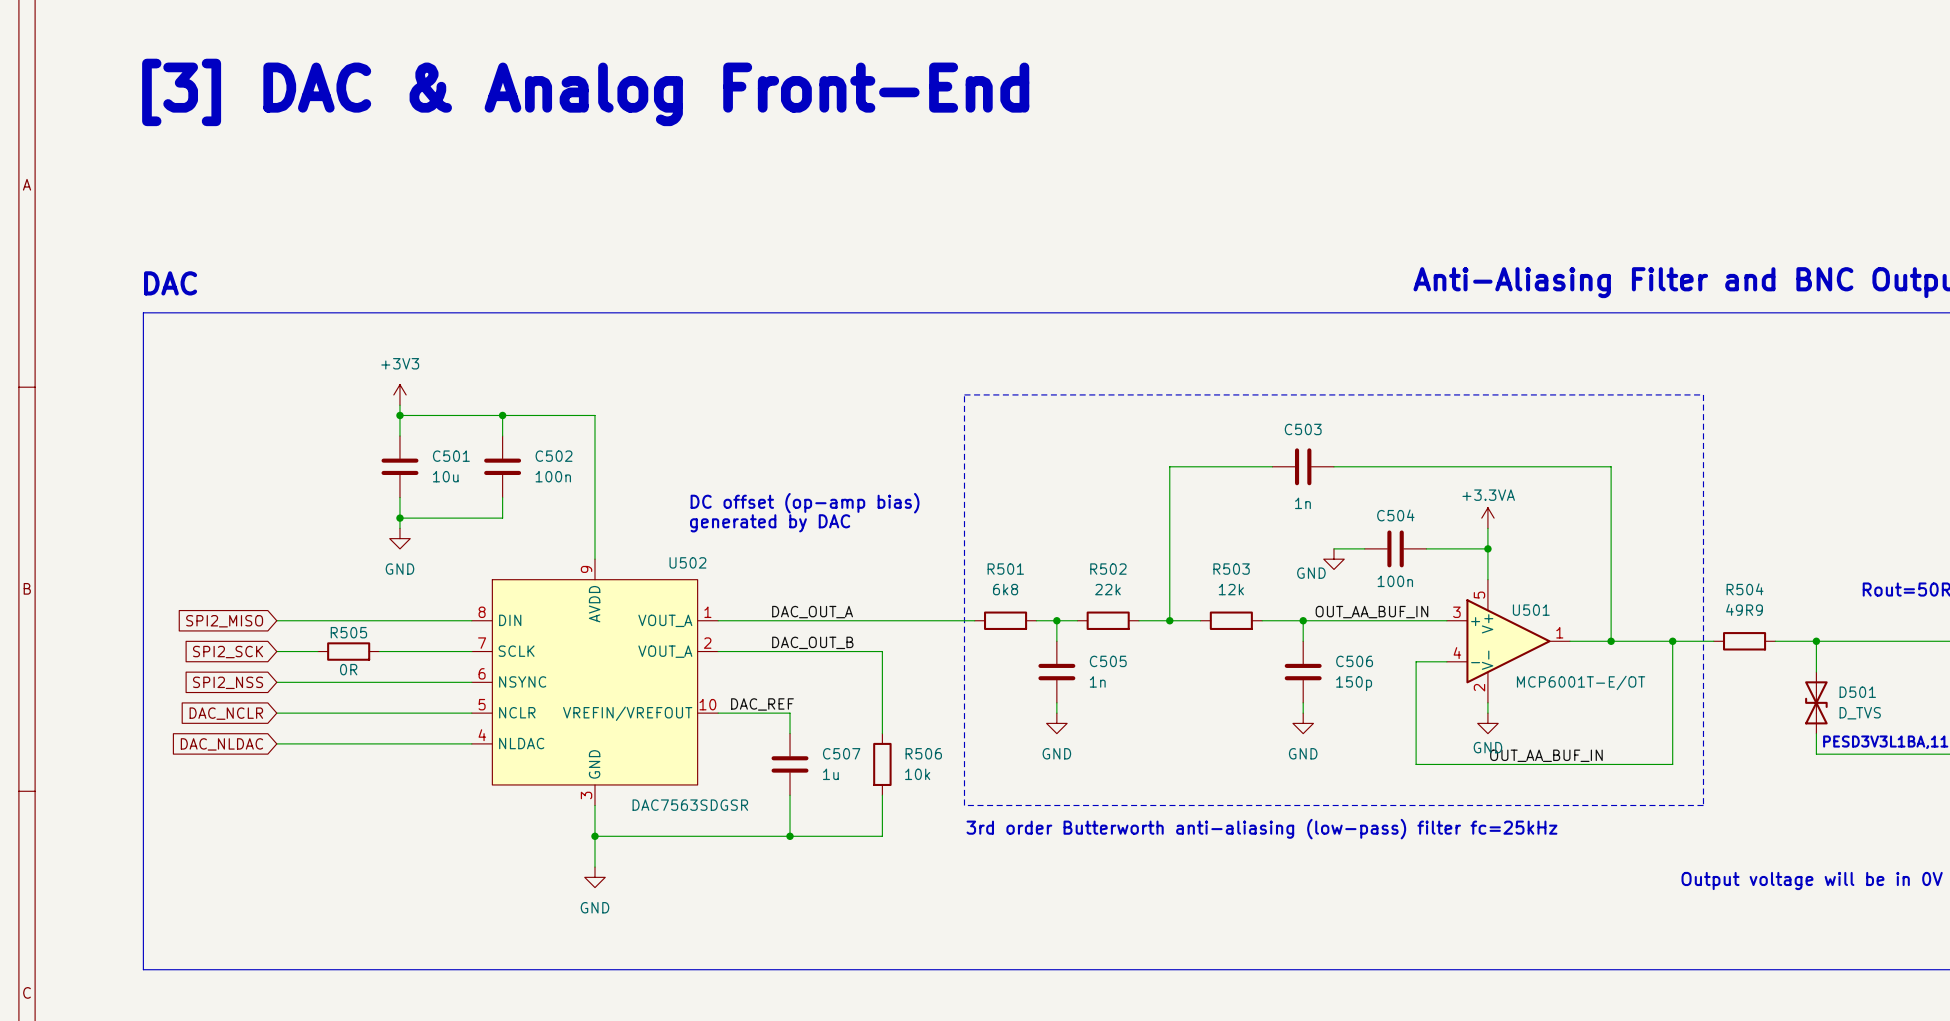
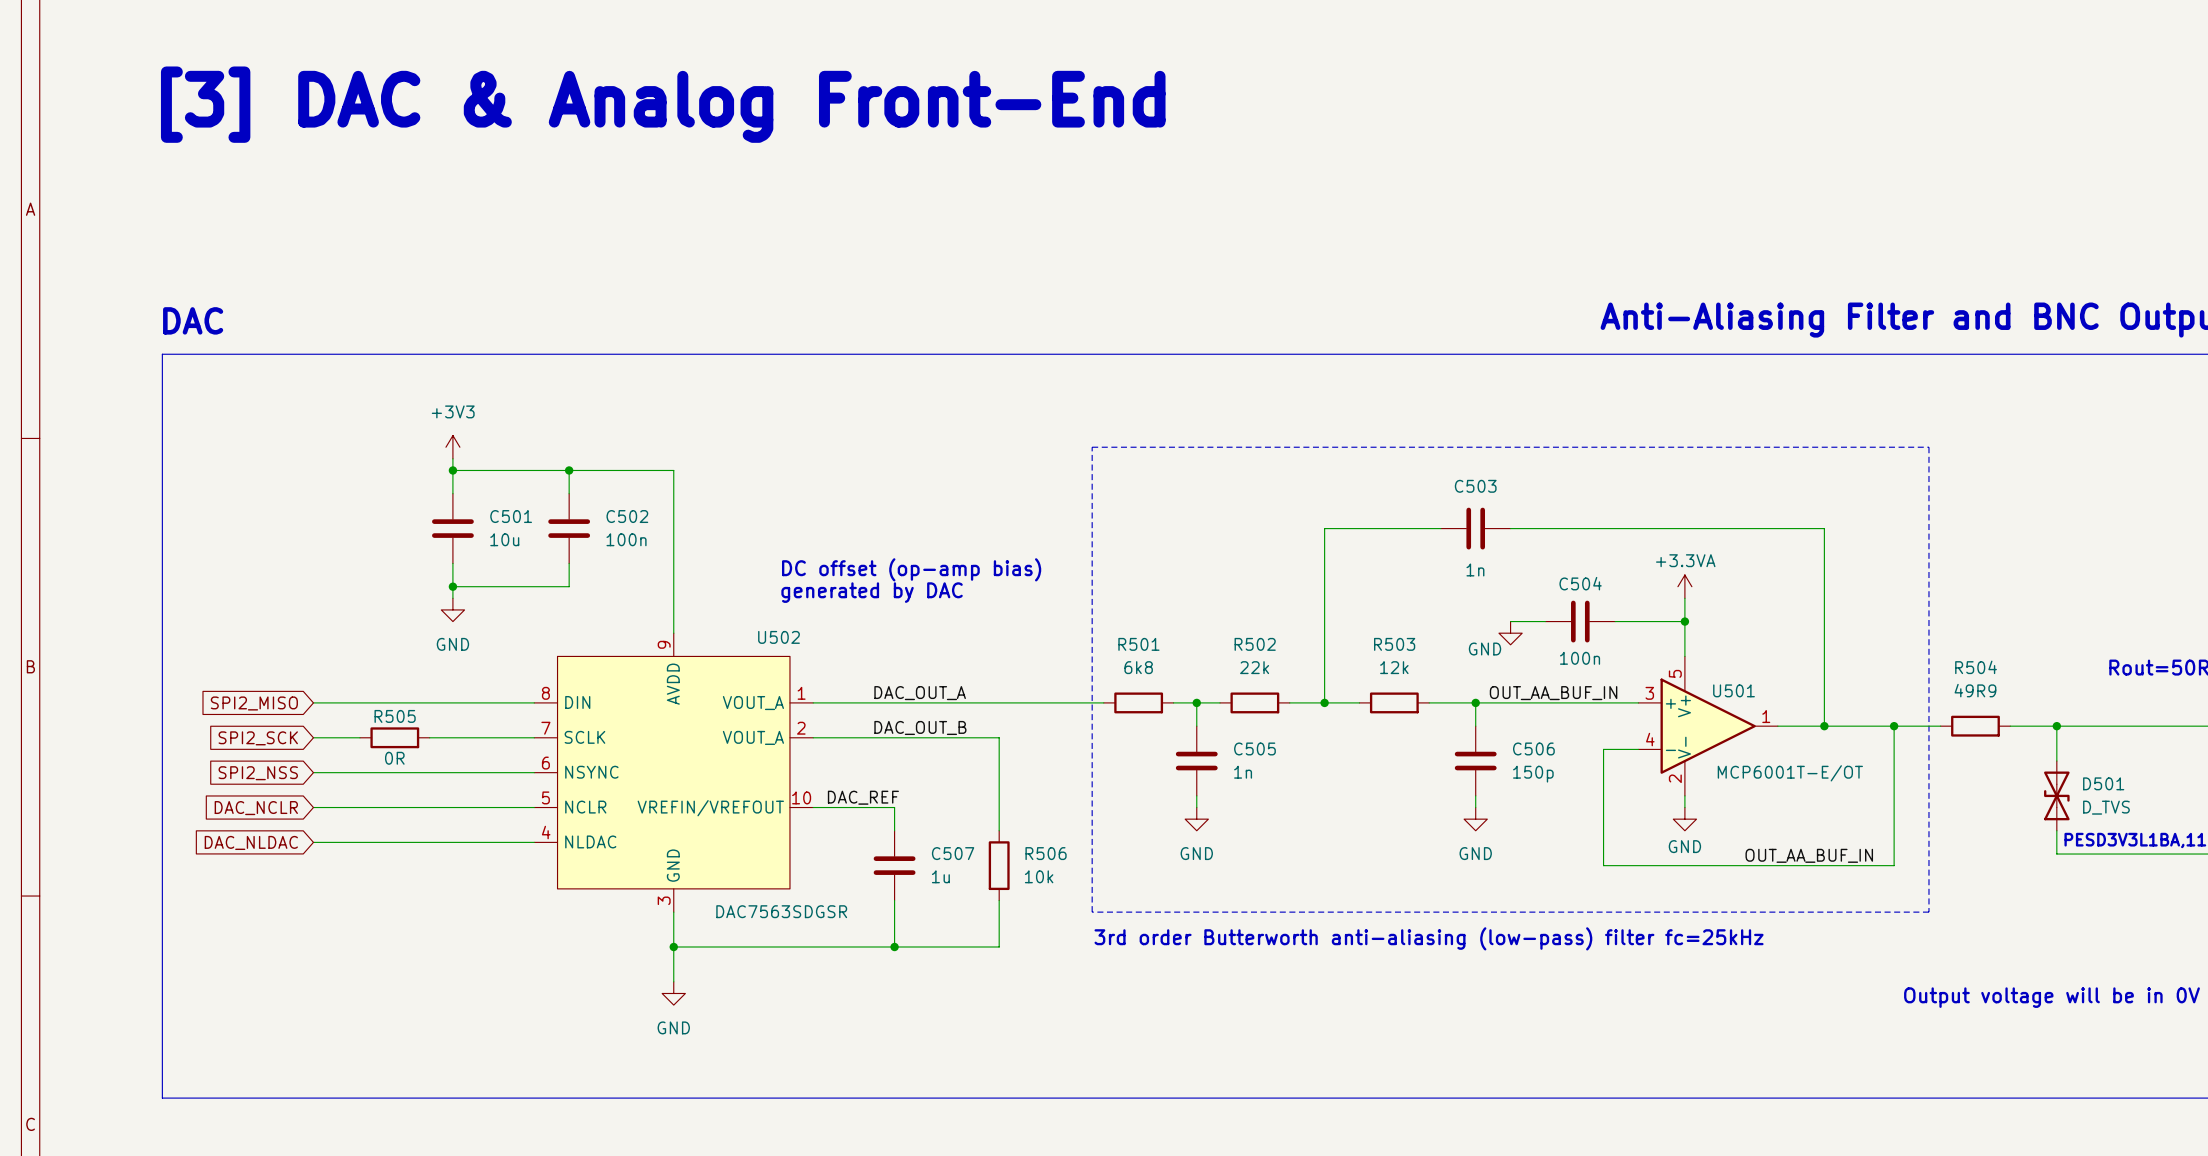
label position: OUT_AA_BUF_IN (1546, 755) -> OUT_AA_BUF_IN (1809, 855)

